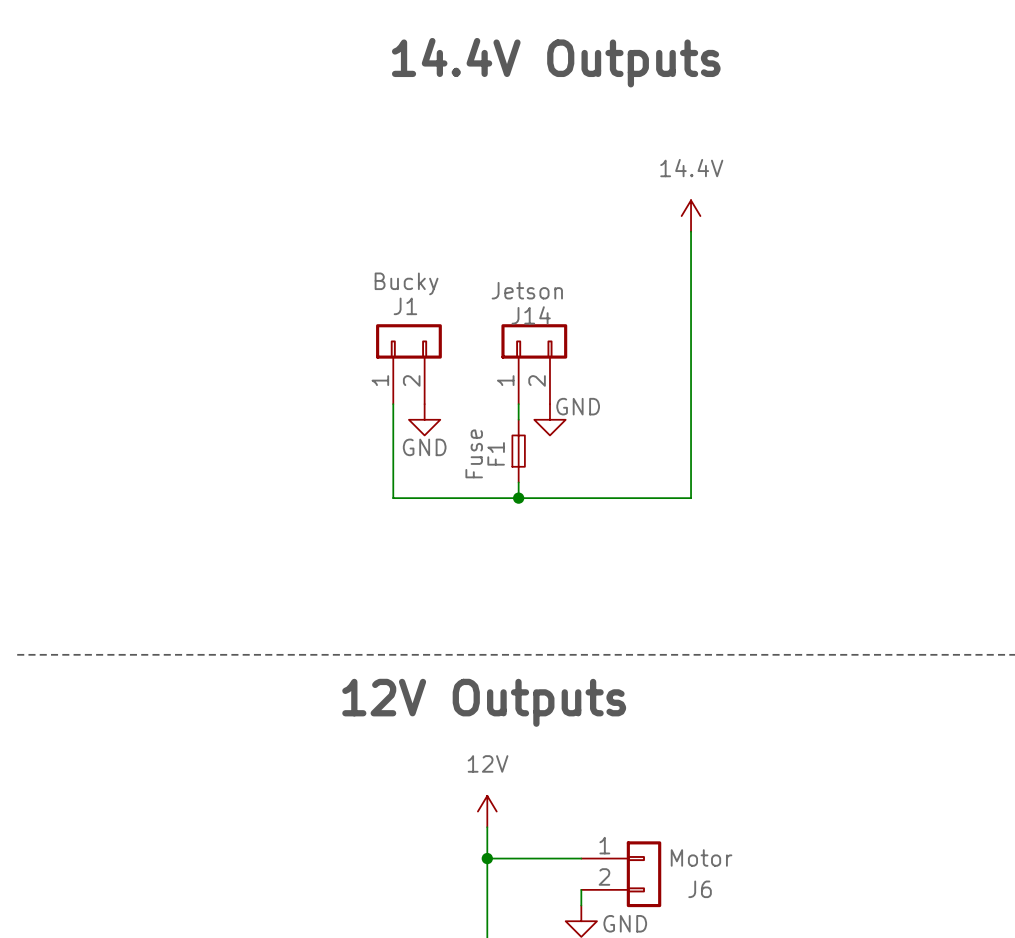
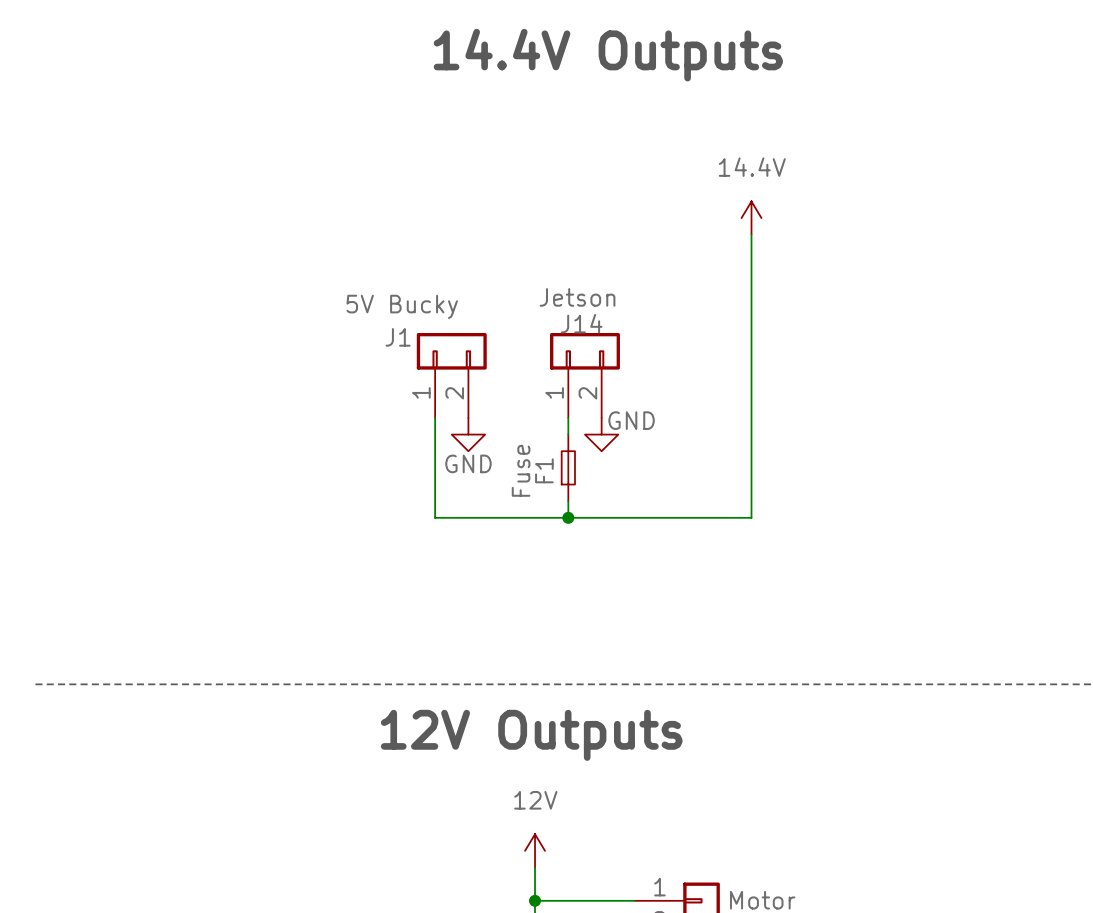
J1 value: Bucky (406, 283) -> 5V Bucky (402, 306)
J1 name position: J1 (405, 306) -> J1 (398, 337)

